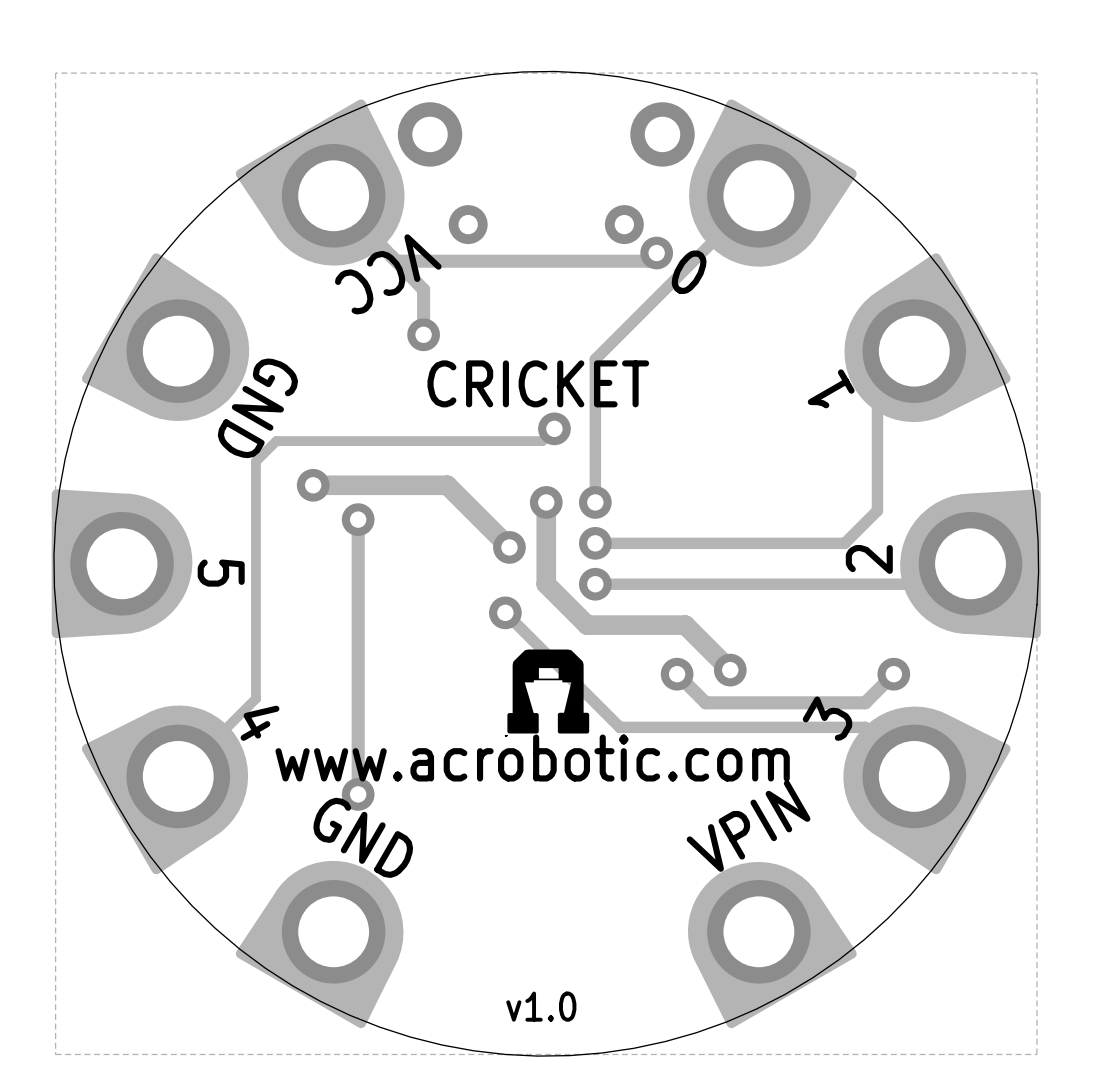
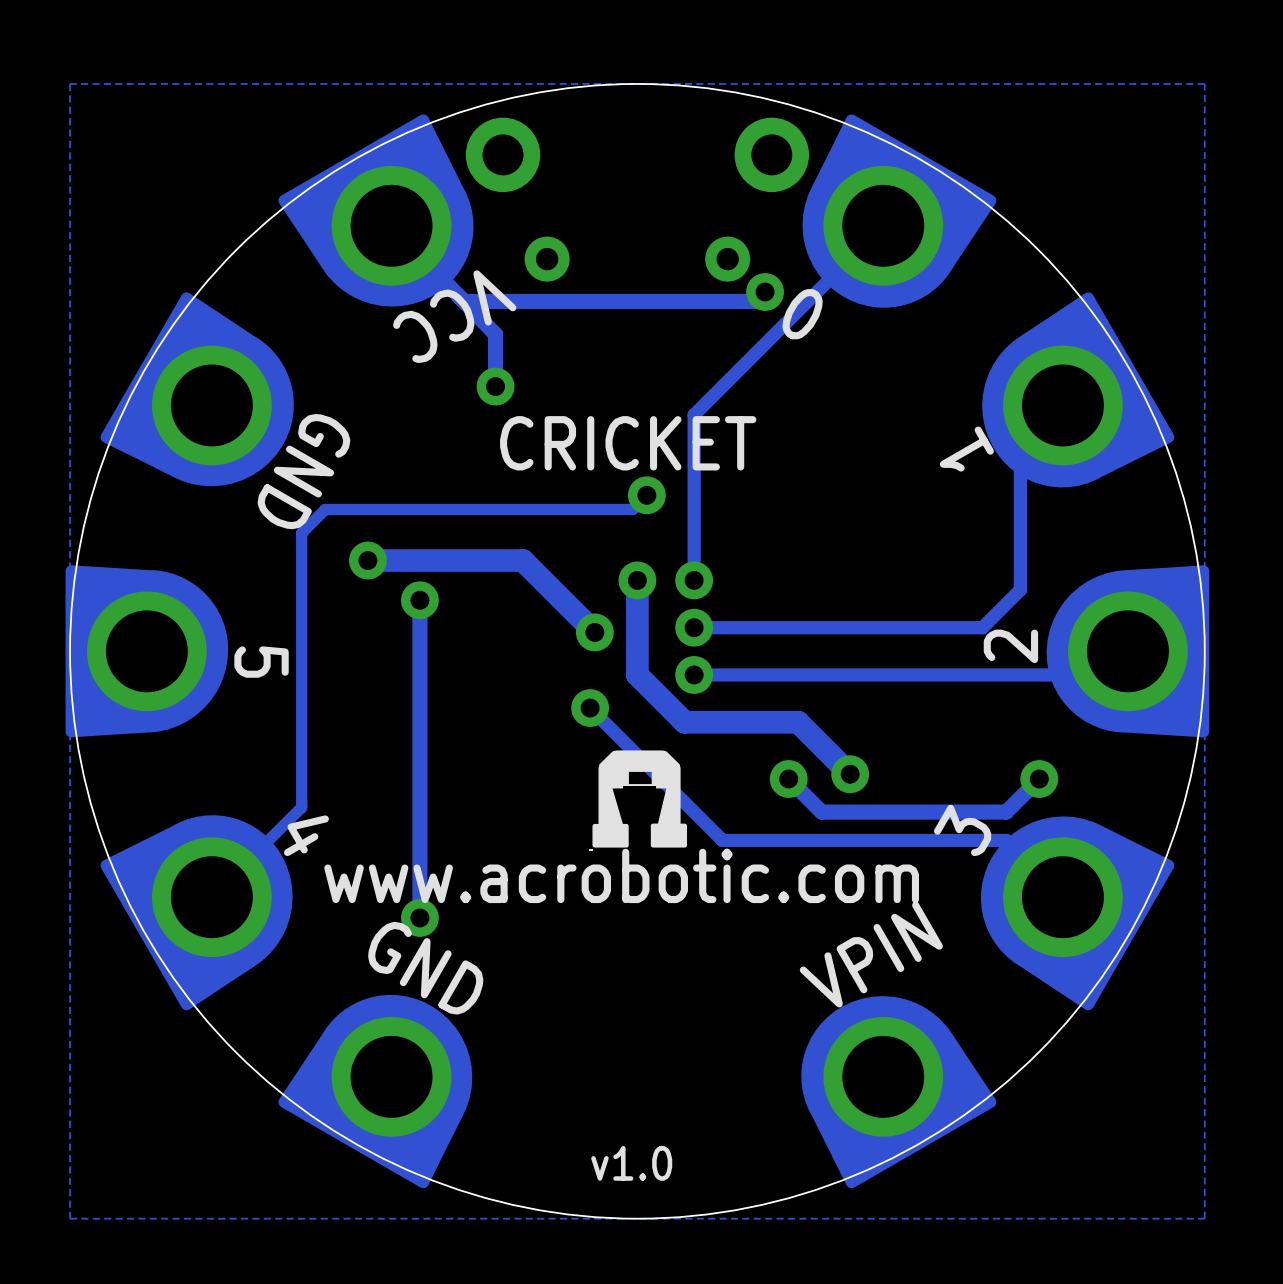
round board edge: none -> [69, 83, 1206, 1220]
board edge: (55, 522) (65, 459) (72, 427) (94, 367) (108, 338) (141, 283) (161, 257) (204, 209) (228, 187) (253, 167) (307, 133) (365, 105) (396, 94) (458, 79) (490, 74) (522, 71) (587, 73) (650, 82) (682, 90) (742, 112) (771, 126) (827, 159) (852, 178) (900, 221) (922, 245) (942, 271) (976, 325) (1004, 383) (1015, 413) (1030, 476) (1035, 508) (1038, 540) (1036, 604) (1027, 668) (1019, 699) (997, 760) (983, 789) (950, 844) (931, 870) (888, 918) (864, 939) (839, 959) (784, 994) (726, 1021) (696, 1032) (633, 1048) (601, 1053) (569, 1055) (505, 1054) (441, 1044) (410, 1037) (349, 1015) (320, 1001) (265, 968) (239, 949) (191, 905) (170, 881) (150, 856) (115, 802) (88, 744) (77, 713) (61, 651) (57, 619) (54, 587) (55, 522) -> none

